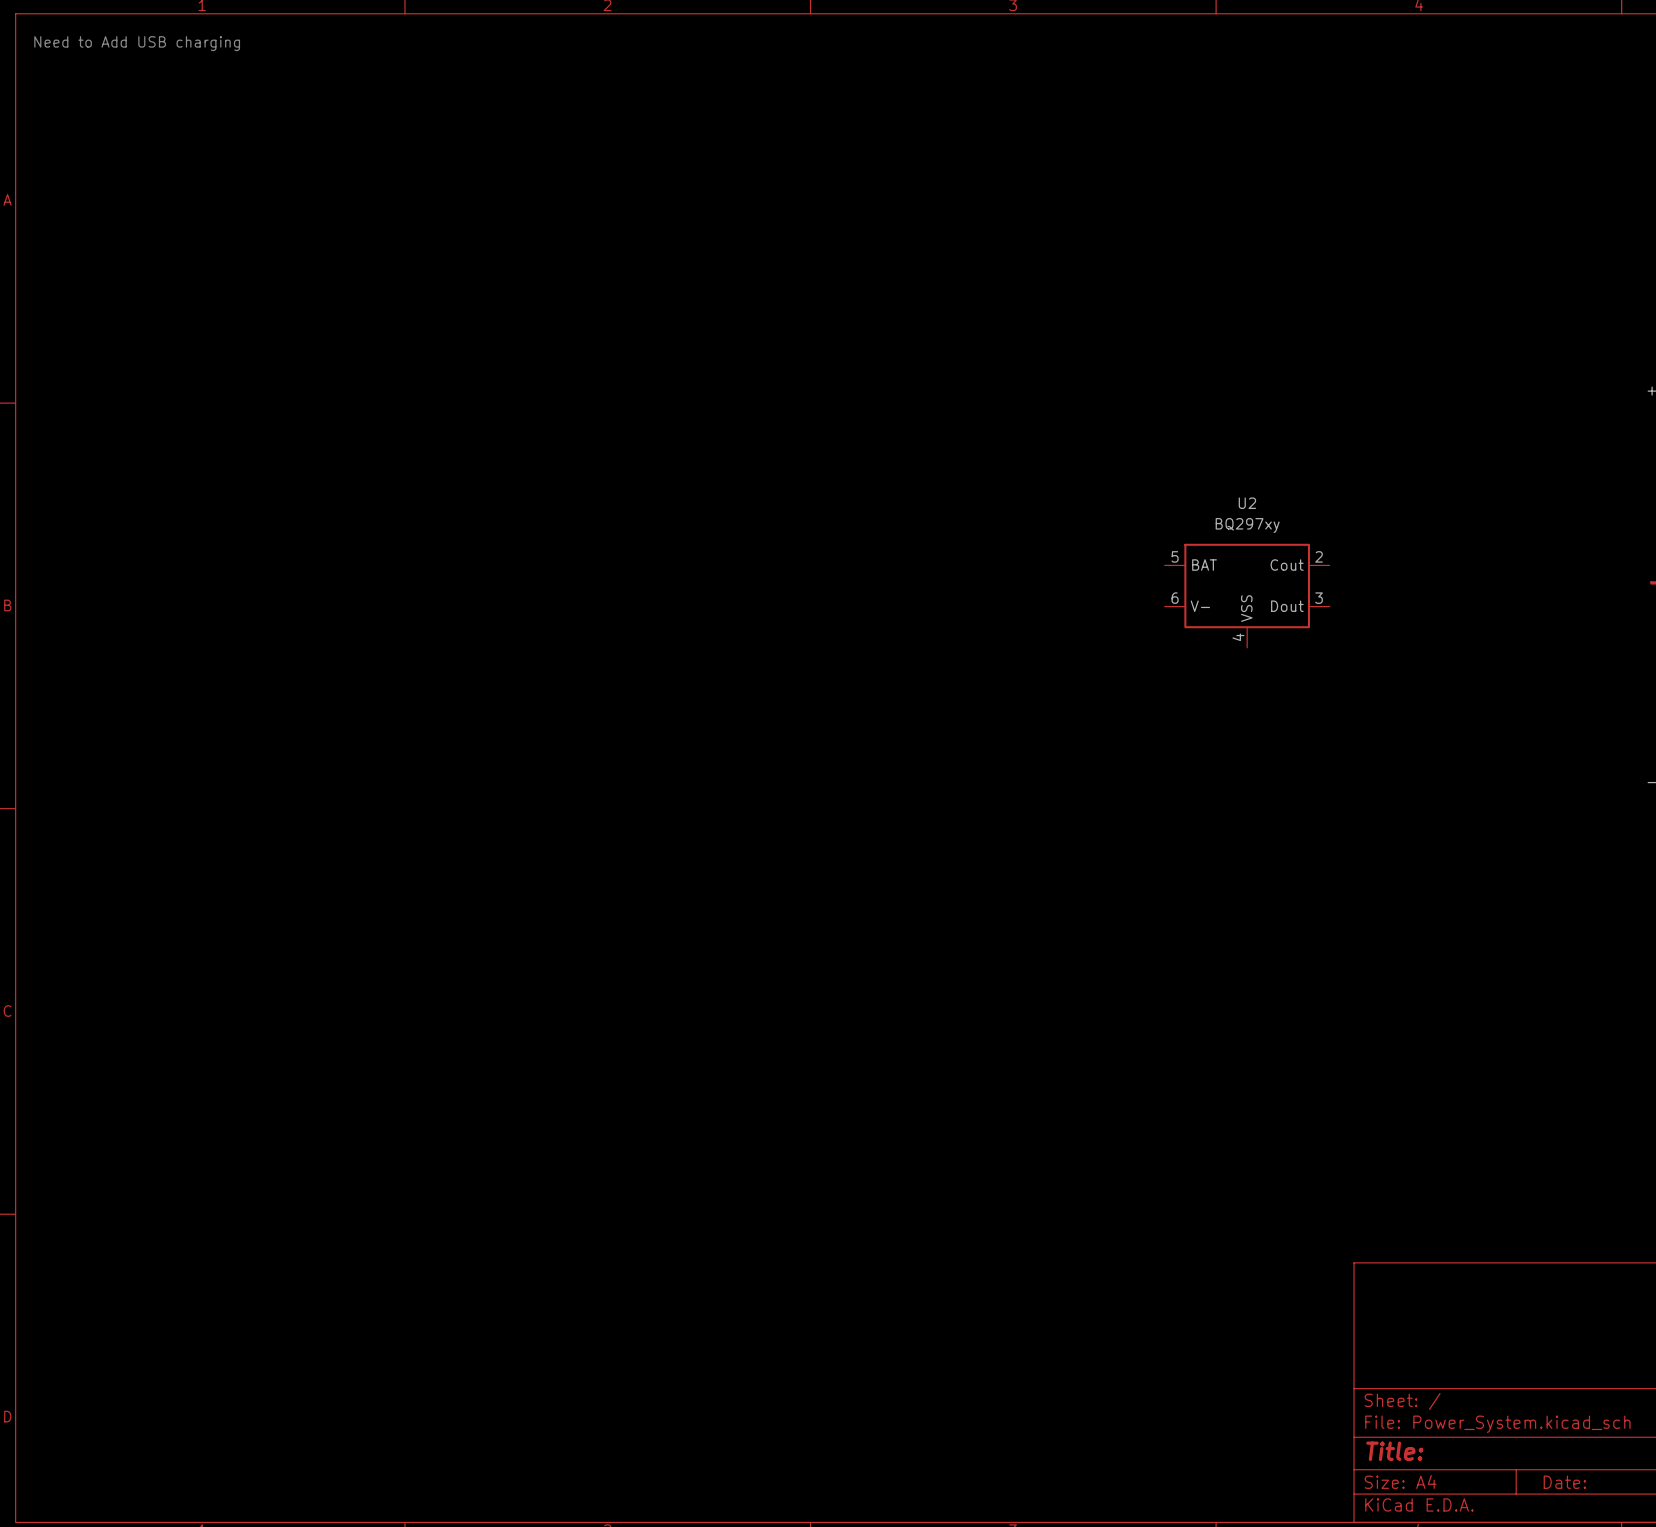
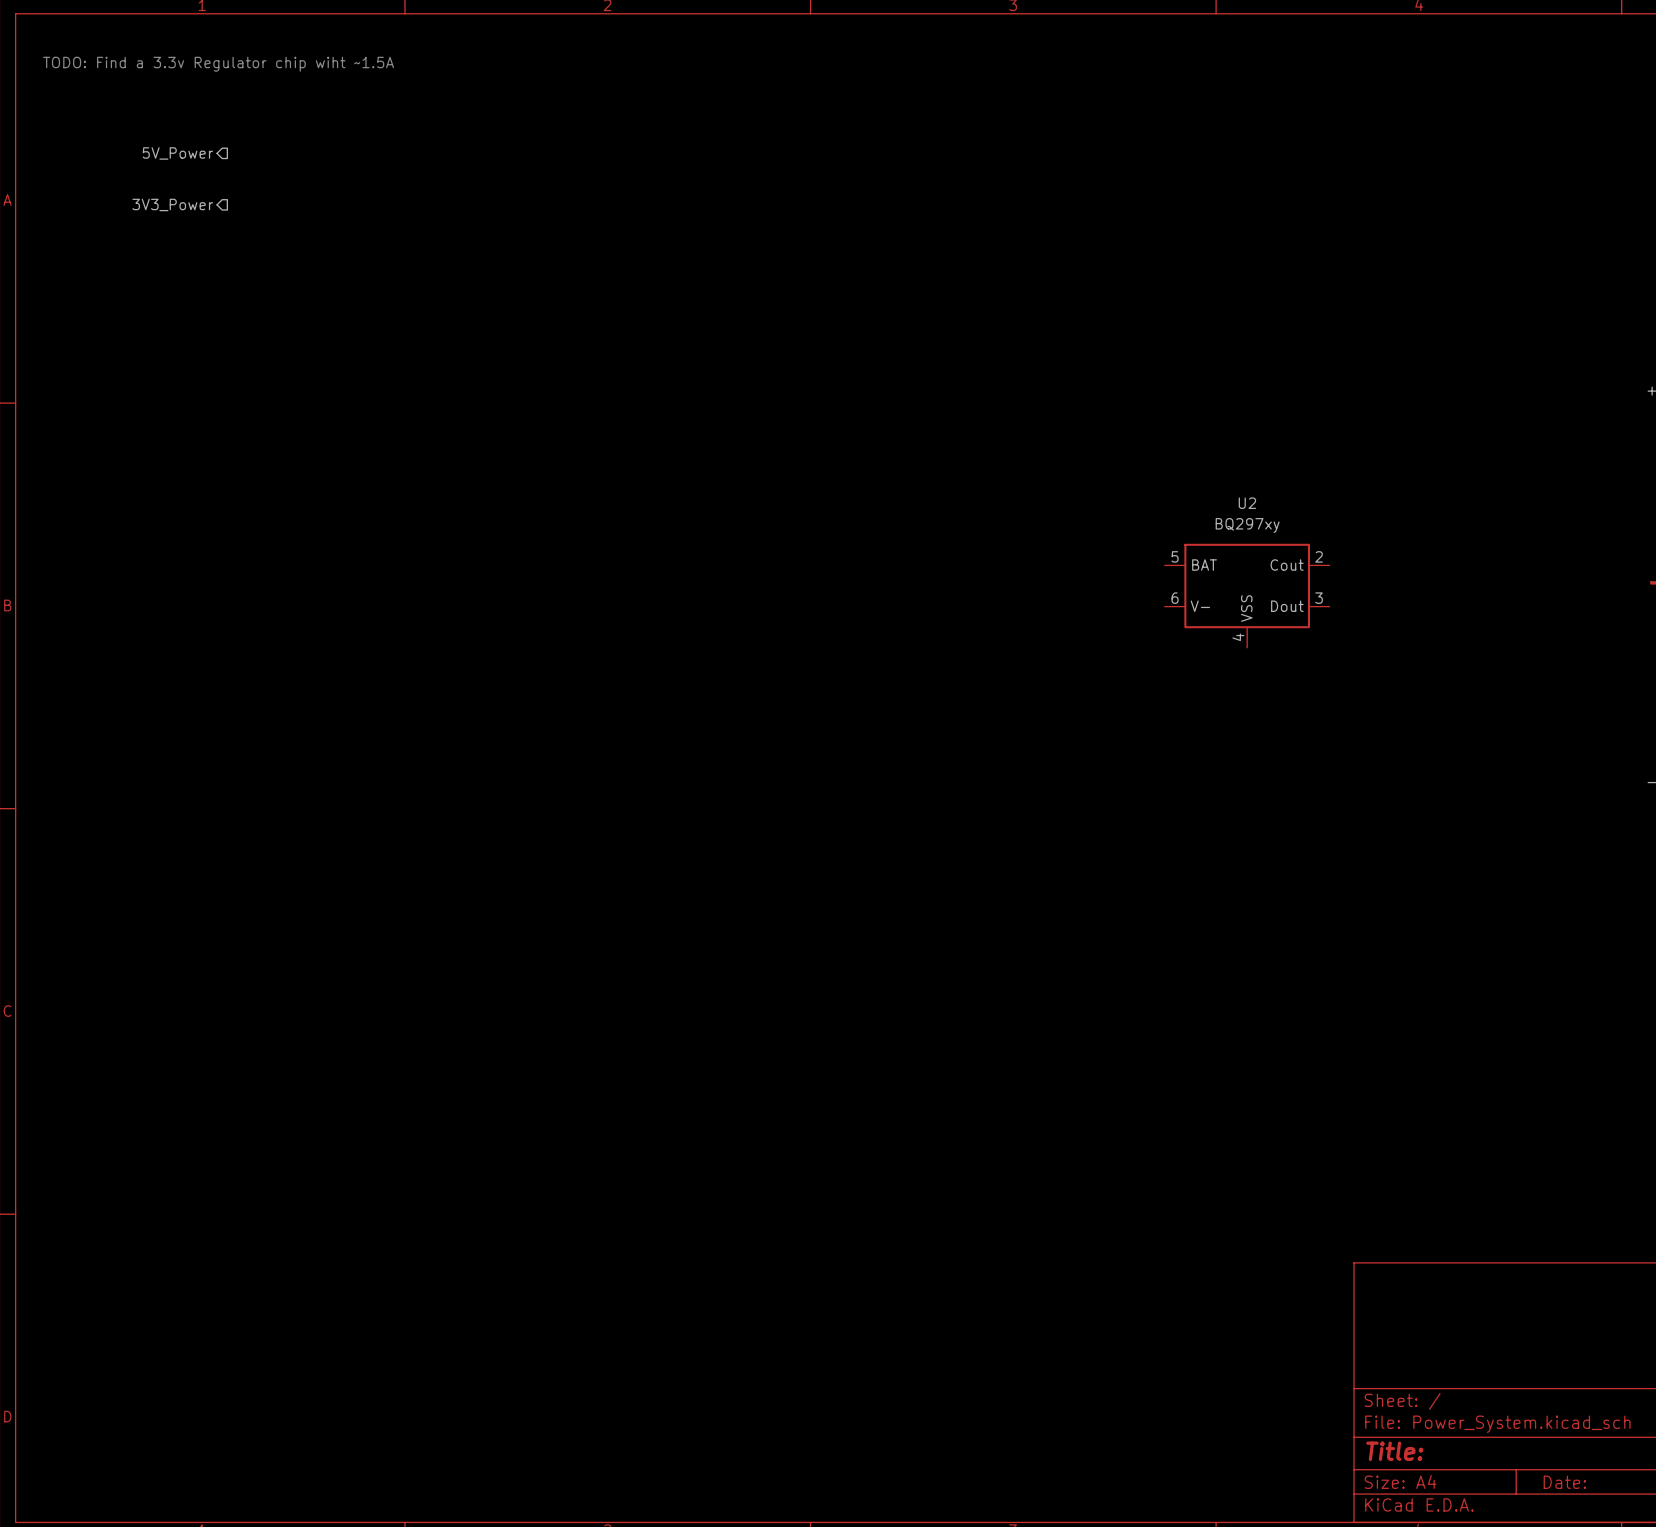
text: Need to Add USB charging (137, 43) -> none
text: none -> TODO: Find a 3.3v Regulator chip wiht ~1.5A (218, 64)
hierarchical label: none -> 5V_Power (177, 153)
hierarchical label: none -> 3V3_Power (172, 204)

